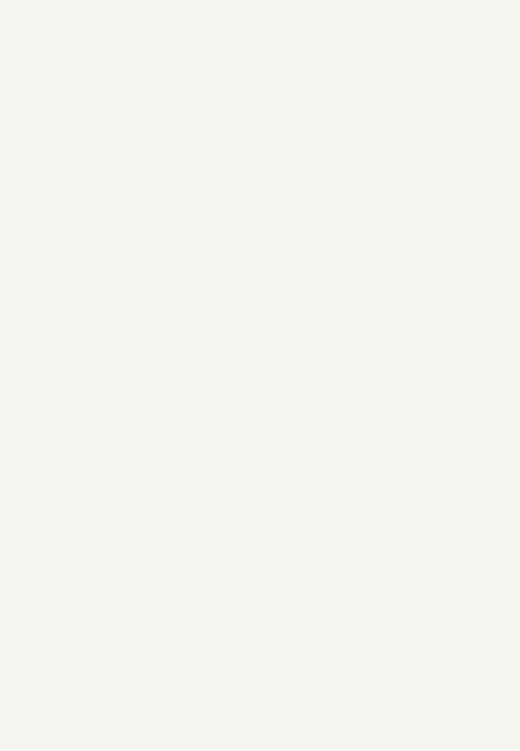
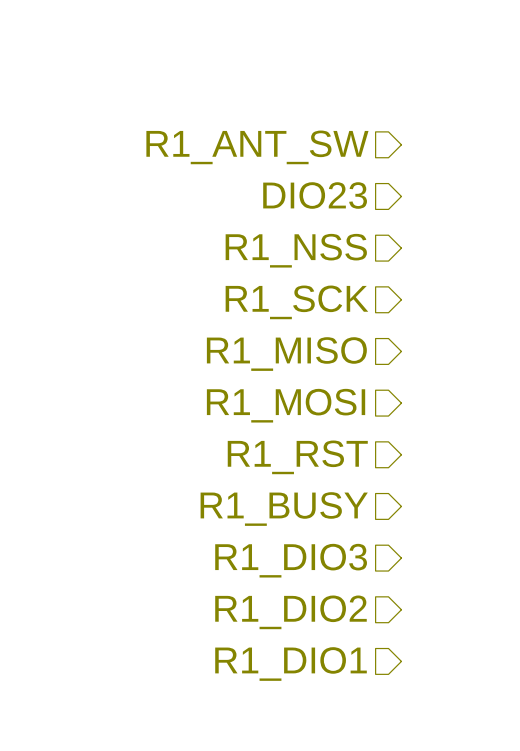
hierarchical label: none -> R1_ANT_SW (257, 147)
hierarchical label: none -> DIO23 (315, 195)
hierarchical label: none -> R1_NSS (296, 250)
hierarchical label: none -> R1_SCK (296, 302)
hierarchical label: none -> R1_MISO (286, 354)
hierarchical label: none -> R1_MOSI (286, 405)
hierarchical label: none -> R1_RST (297, 457)
hierarchical label: none -> R1_BUSY (284, 509)
hierarchical label: none -> R1_DIO3 (291, 560)
hierarchical label: none -> R1_DIO2 (290, 612)
hierarchical label: none -> R1_DIO1 (291, 664)

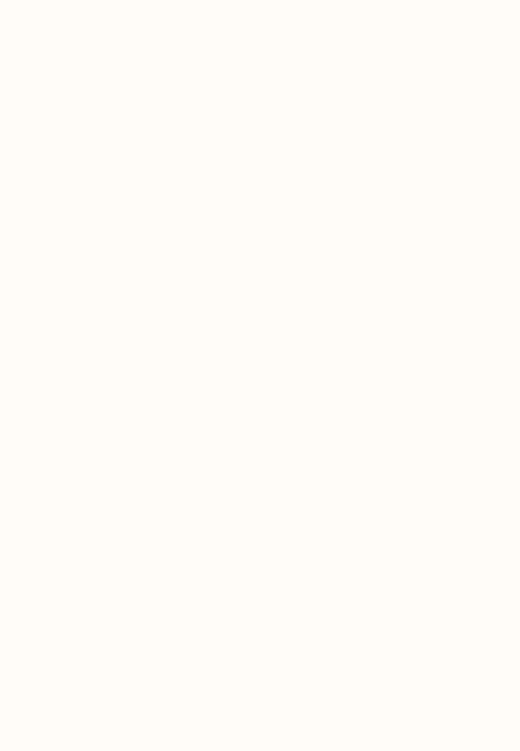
hierarchical label: R1_ANT_SW (257, 147) -> none
hierarchical label: DIO23 (315, 195) -> none
hierarchical label: R1_NSS (296, 250) -> none
hierarchical label: R1_SCK (296, 302) -> none
hierarchical label: R1_MISO (286, 354) -> none
hierarchical label: R1_MOSI (286, 405) -> none
hierarchical label: R1_RST (297, 457) -> none
hierarchical label: R1_BUSY (284, 509) -> none
hierarchical label: R1_DIO3 (291, 560) -> none
hierarchical label: R1_DIO2 (290, 612) -> none
hierarchical label: R1_DIO1 (291, 664) -> none

